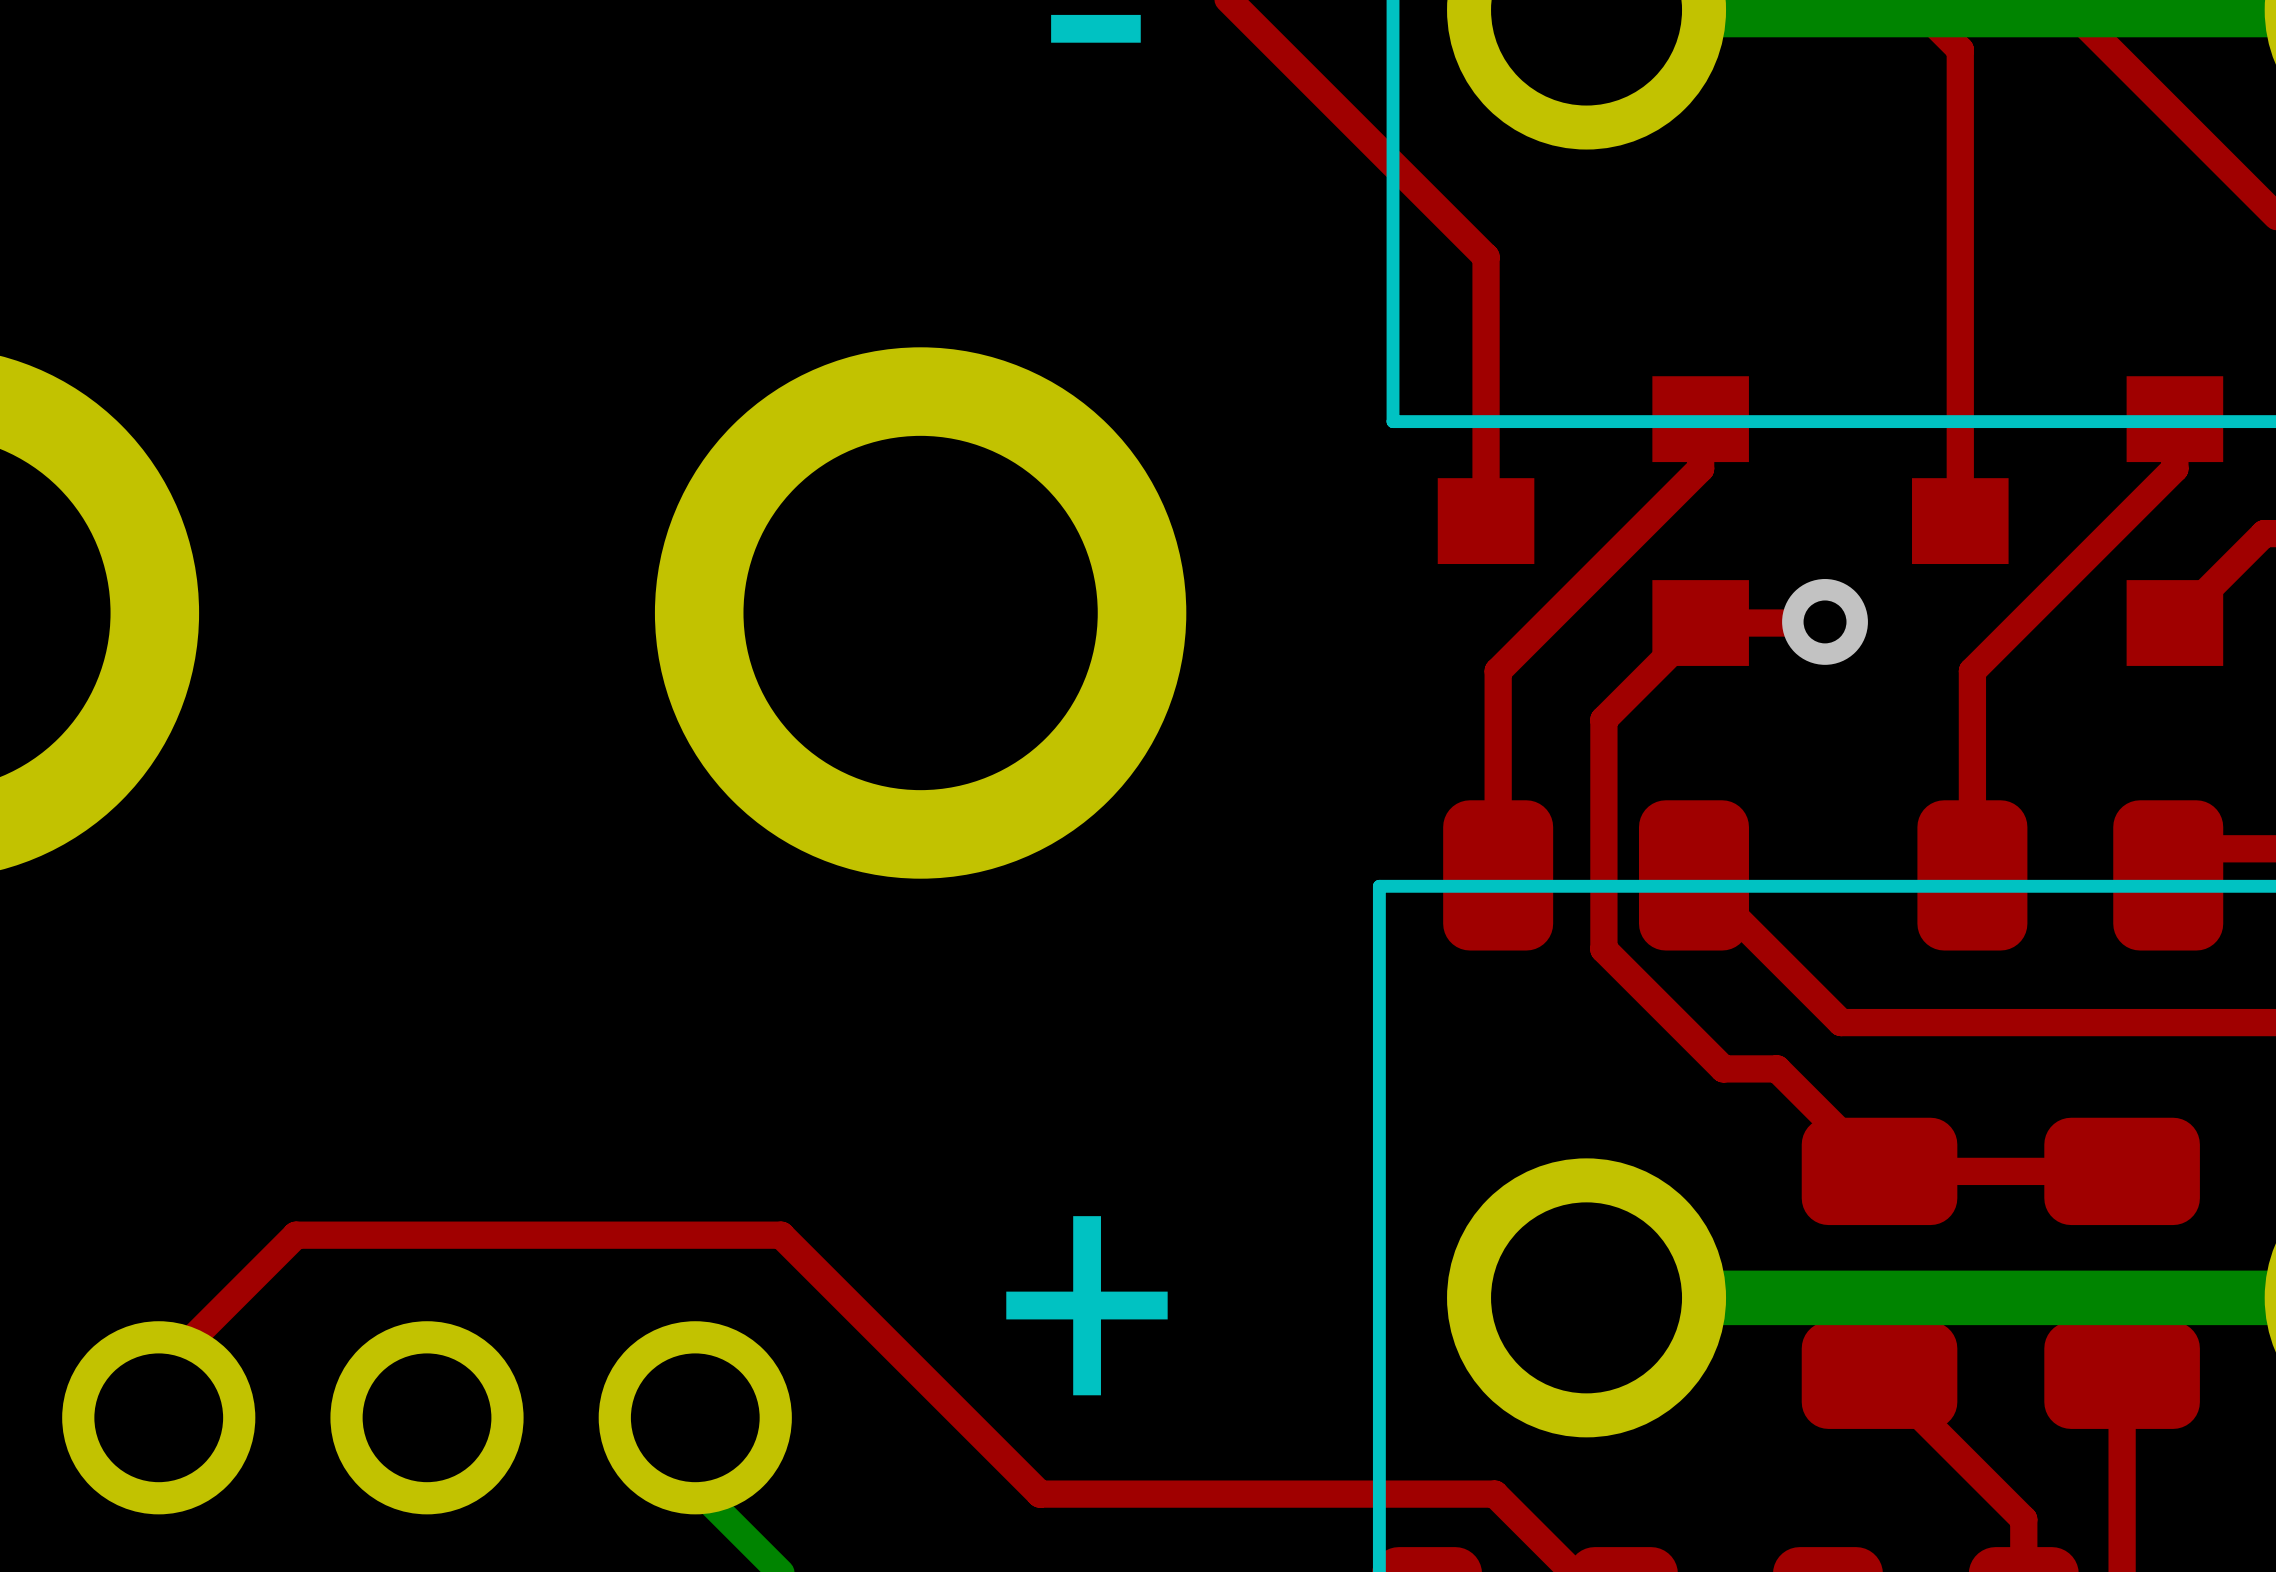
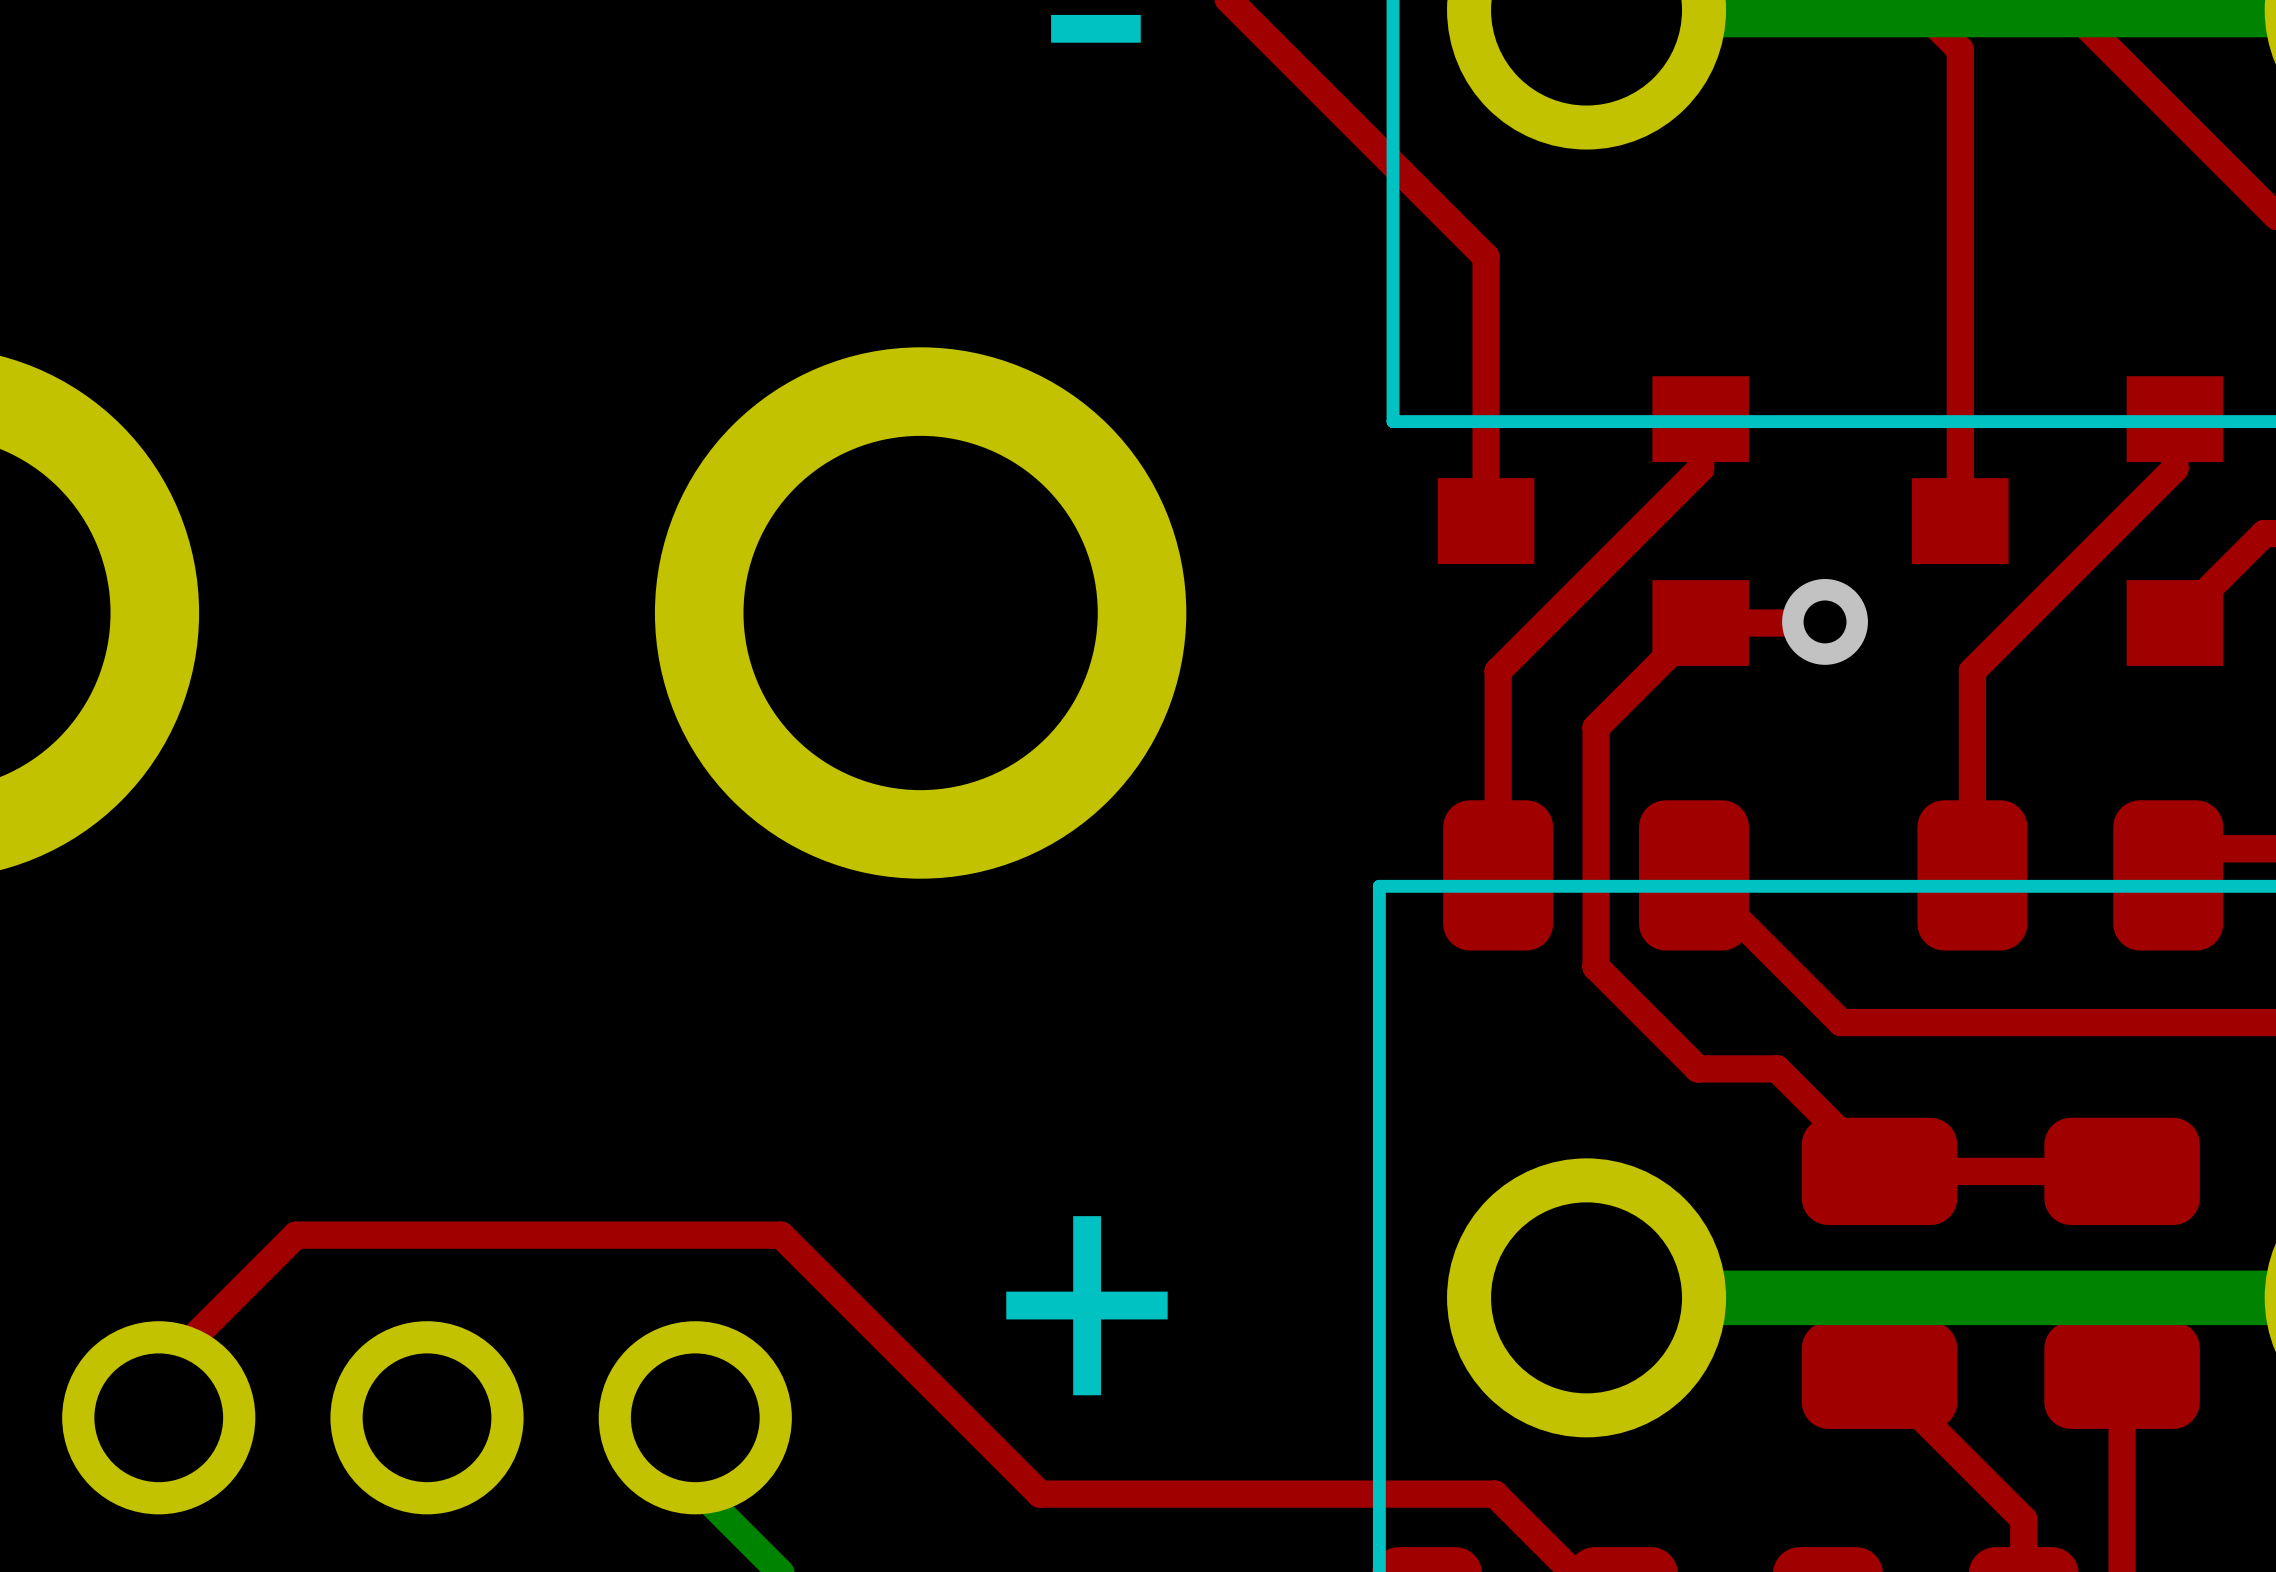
top track: (1603, 719) (1603, 949) (1723, 1068) -> (1603, 719) (1596, 727) (1596, 967) (1697, 1068) (1723, 1068)

